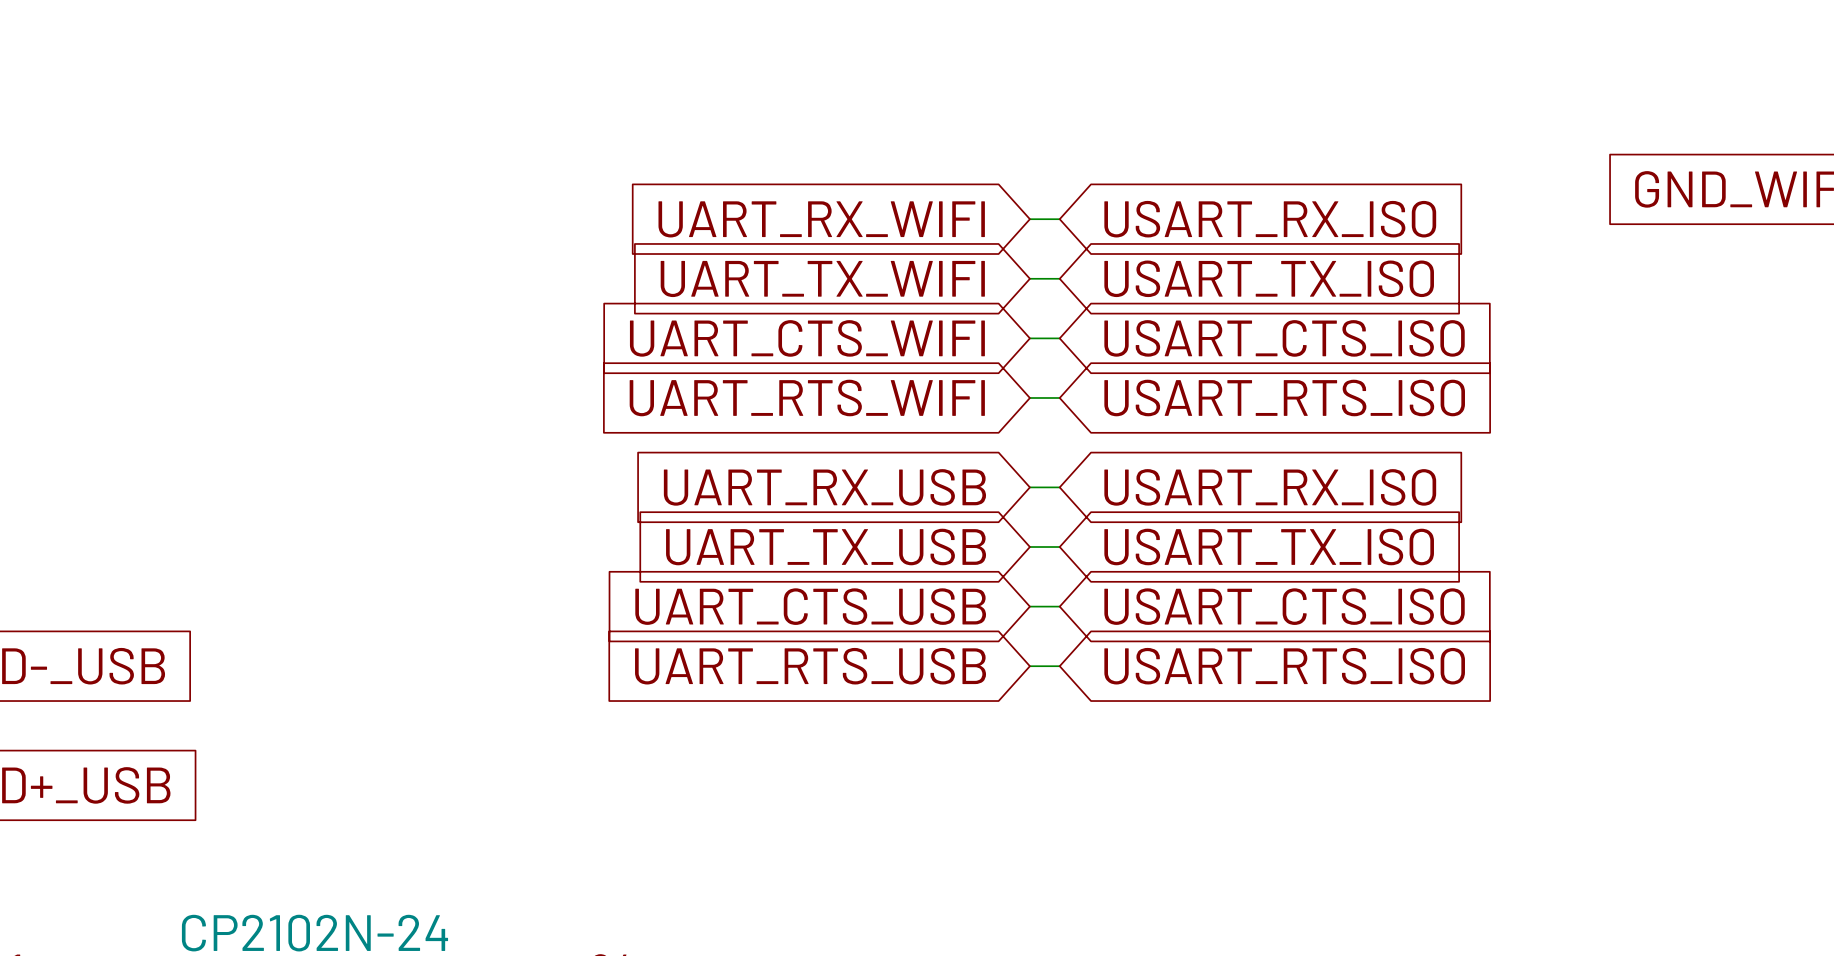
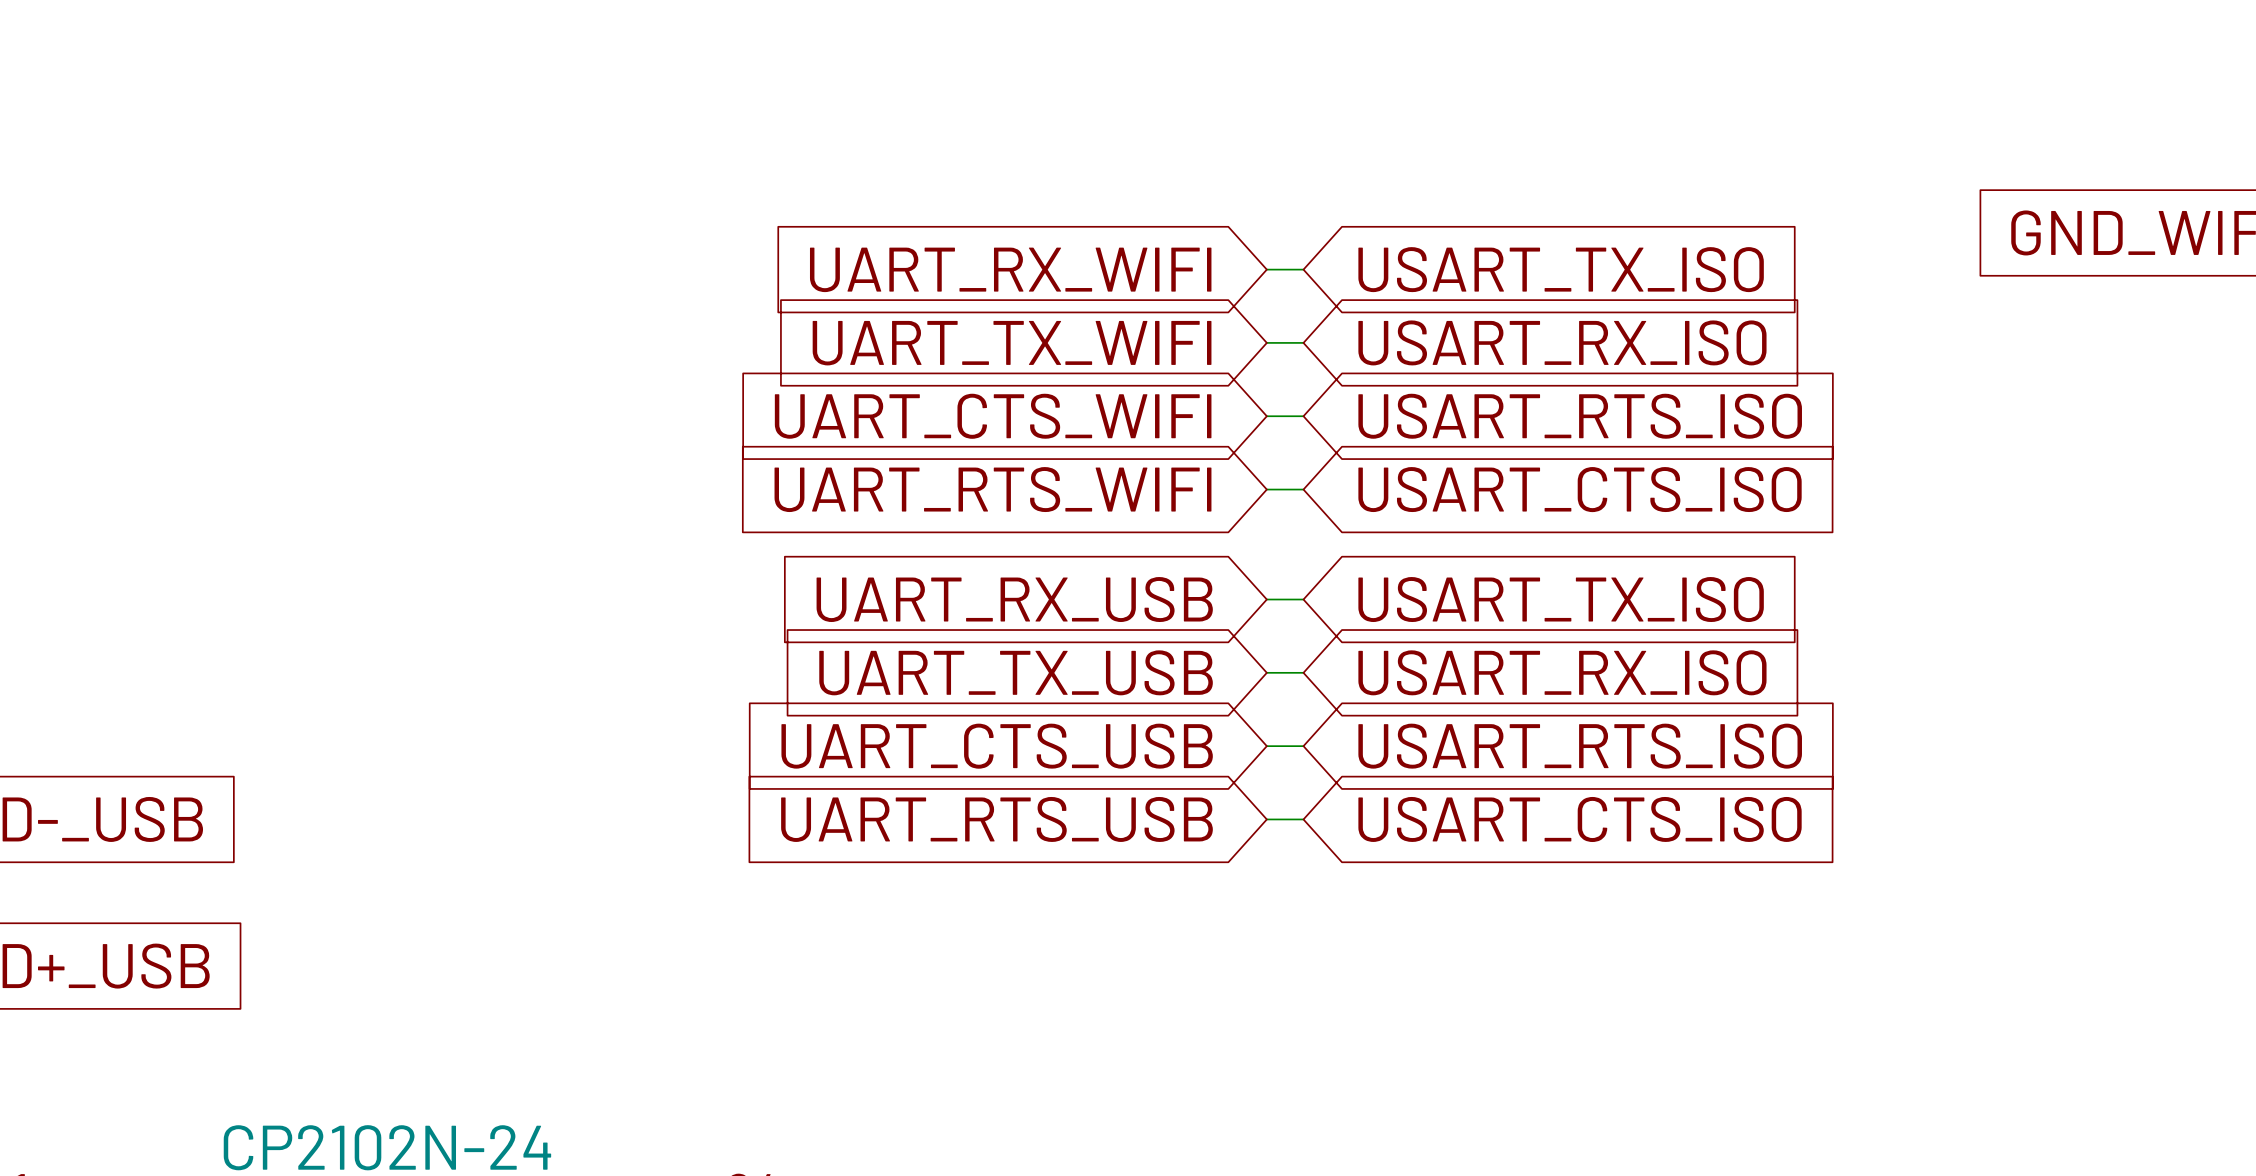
global label: USART_RX_ISO (1270, 219) -> USART_TX_ISO (1561, 269)
global label: USART_TX_ISO (1269, 278) -> USART_RX_ISO (1562, 342)
global label: USART_CTS_ISO (1284, 338) -> USART_RTS_ISO (1580, 416)
global label: USART_RTS_ISO (1284, 397) -> USART_CTS_ISO (1580, 489)
global label: USART_RX_ISO (1270, 487) -> USART_TX_ISO (1561, 599)
global label: USART_TX_ISO (1269, 547) -> USART_RX_ISO (1562, 672)
global label: USART_CTS_ISO (1284, 606) -> USART_RTS_ISO (1580, 746)
global label: USART_RTS_ISO (1284, 666) -> USART_CTS_ISO (1580, 819)

